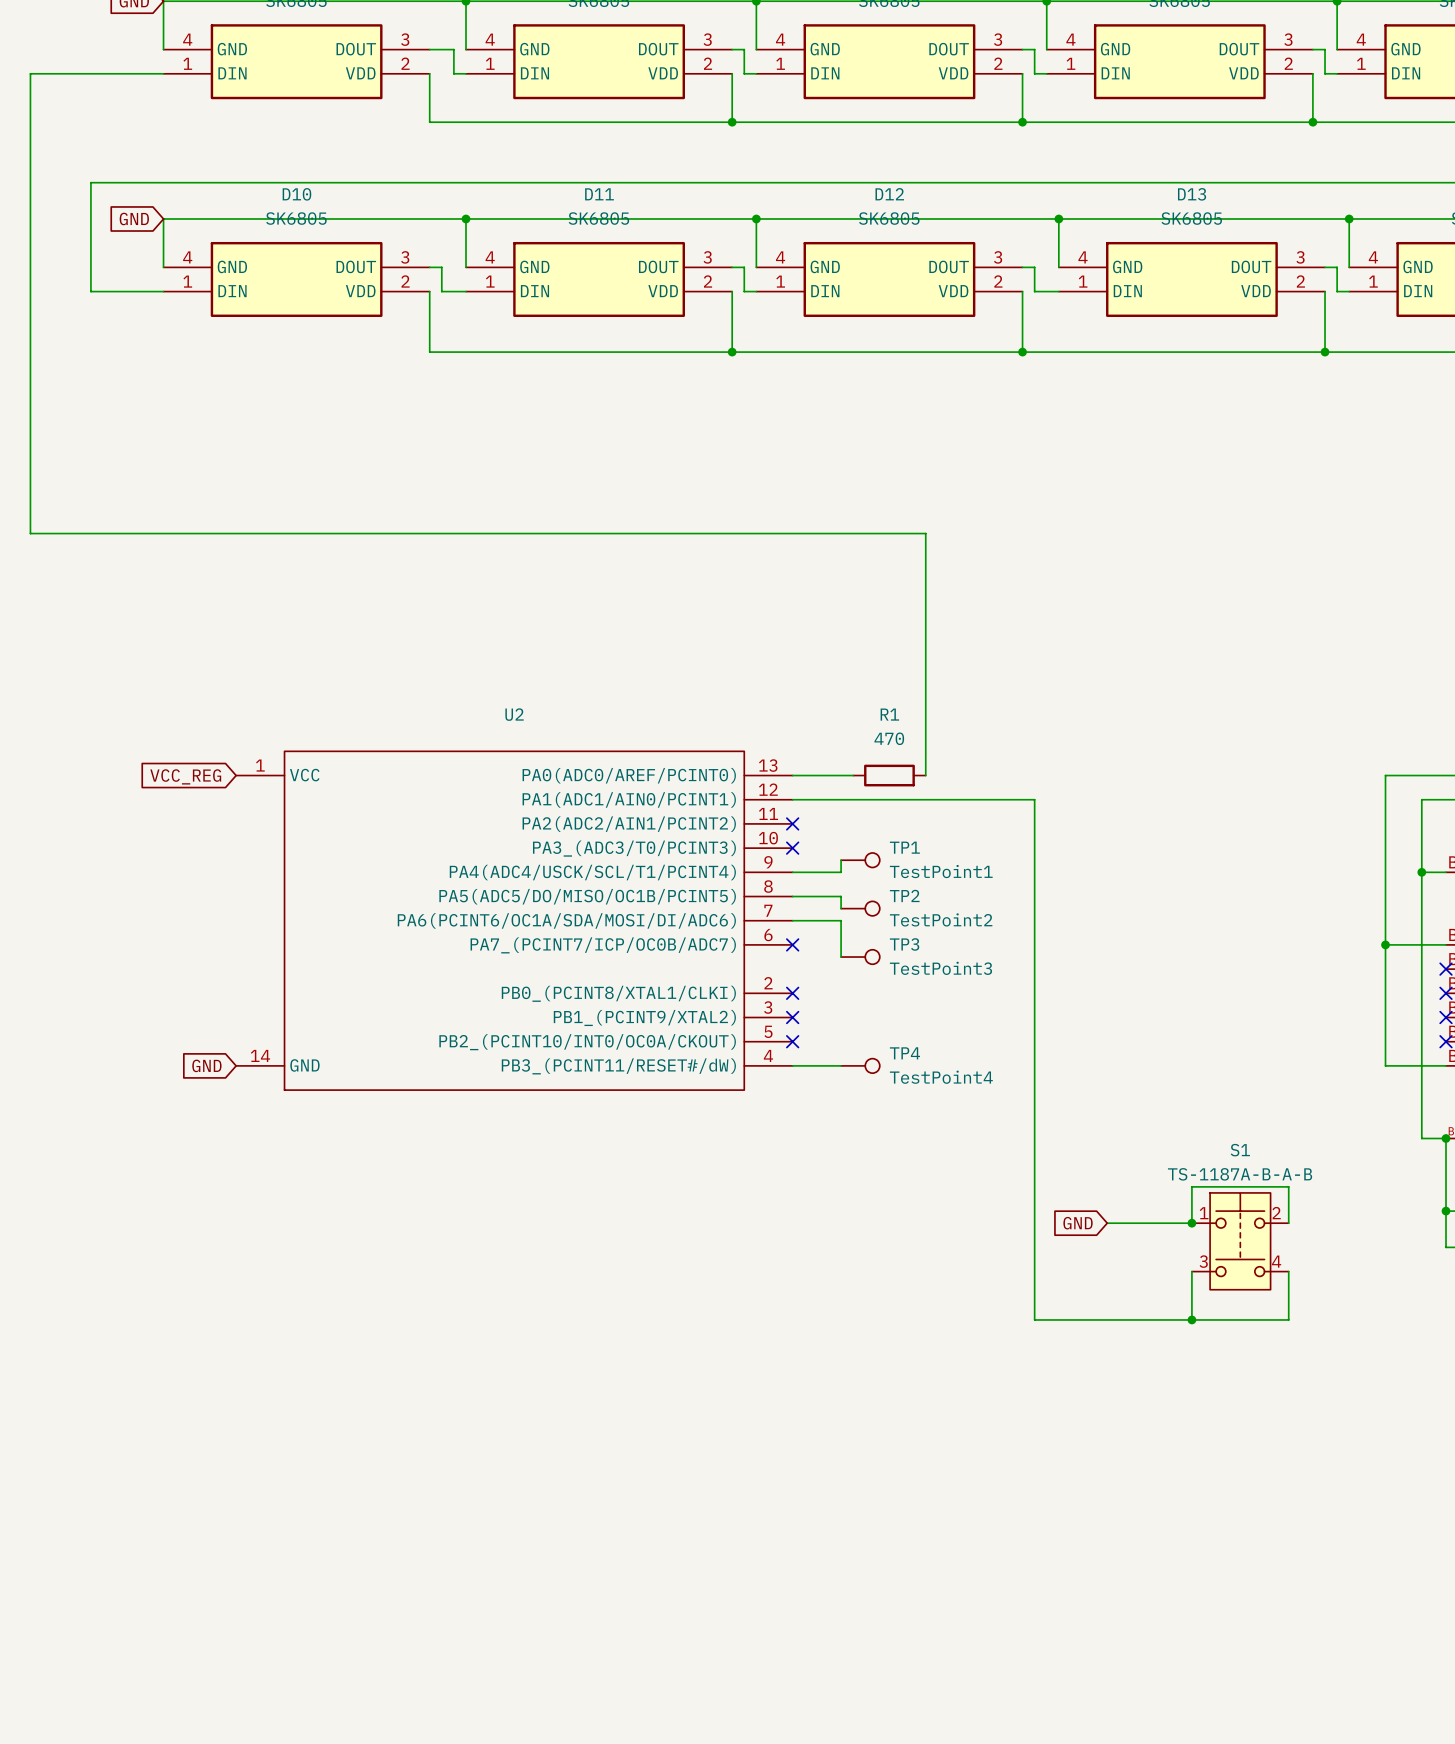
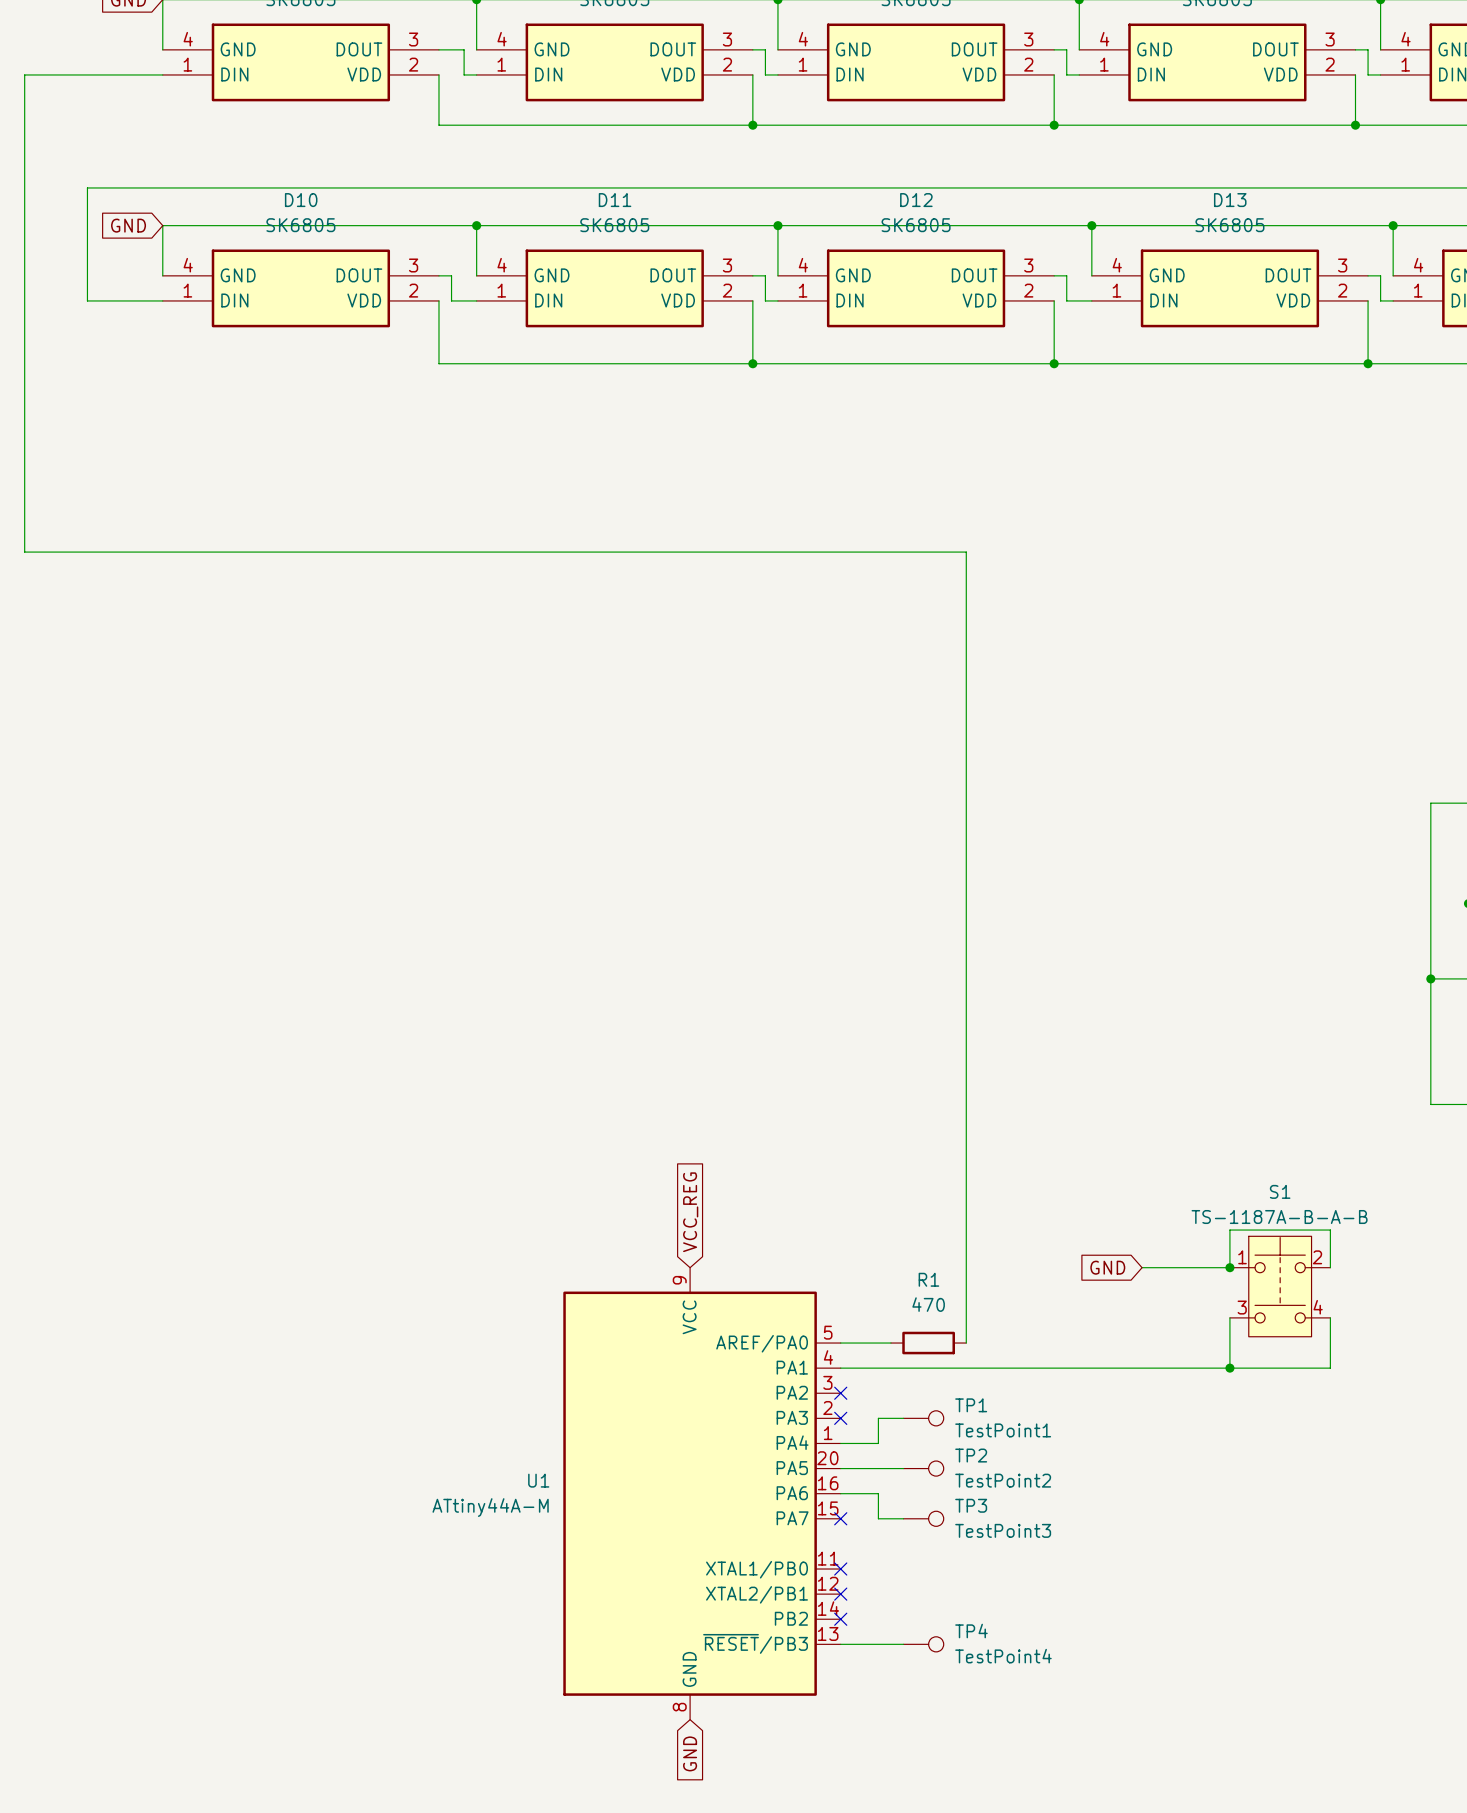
wire: (925, 533) (925, 775) -> (953, 552) (966, 552) (966, 1343)
wire: (792, 775) (853, 775) -> none
R1 position: (889, 775) -> (928, 1343)
global label: VCC_REG (185, 776) -> none
wire: (792, 799) (1034, 799) (1034, 1319) -> (840, 1368) (1066, 1368)
no-connect mark: (792, 823) -> none
no-connect mark: (792, 848) -> none
wire: (841, 860) (841, 872) (792, 872) -> none
TP1 position: (860, 860) -> (923, 1418)
wire: (792, 896) (841, 896) (841, 908) -> none
TP2 position: (860, 908) -> (923, 1468)
U2: (514, 920) -> none
wire: (792, 920) (841, 920) (841, 957) -> none
no-connect mark: (792, 944) -> none
TP3 position: (860, 957) -> (923, 1518)
no-connect mark: (792, 993) -> none
no-connect mark: (792, 1017) -> none
no-connect mark: (792, 1041) -> none
global label: GND (206, 1065) -> none
wire: (792, 1065) (841, 1065) -> (840, 1343) (890, 1343)
TP4 position: (860, 1065) -> (923, 1644)
global label: none -> VCC_REG (690, 1212)
no-connect mark: none -> (840, 1393)
no-connect mark: none -> (840, 1418)
wire: none -> (903, 1418) (878, 1418) (878, 1443) (840, 1443)
wire: none -> (840, 1468) (903, 1468)
U1: none -> ATtiny44A-M (702, 1493)
wire: none -> (840, 1493) (878, 1493) (878, 1518) (903, 1518)
no-connect mark: none -> (840, 1518)
no-connect mark: none -> (840, 1569)
no-connect mark: none -> (840, 1594)
no-connect mark: none -> (840, 1619)
wire: none -> (840, 1644) (903, 1644)
global label: none -> GND (690, 1753)

